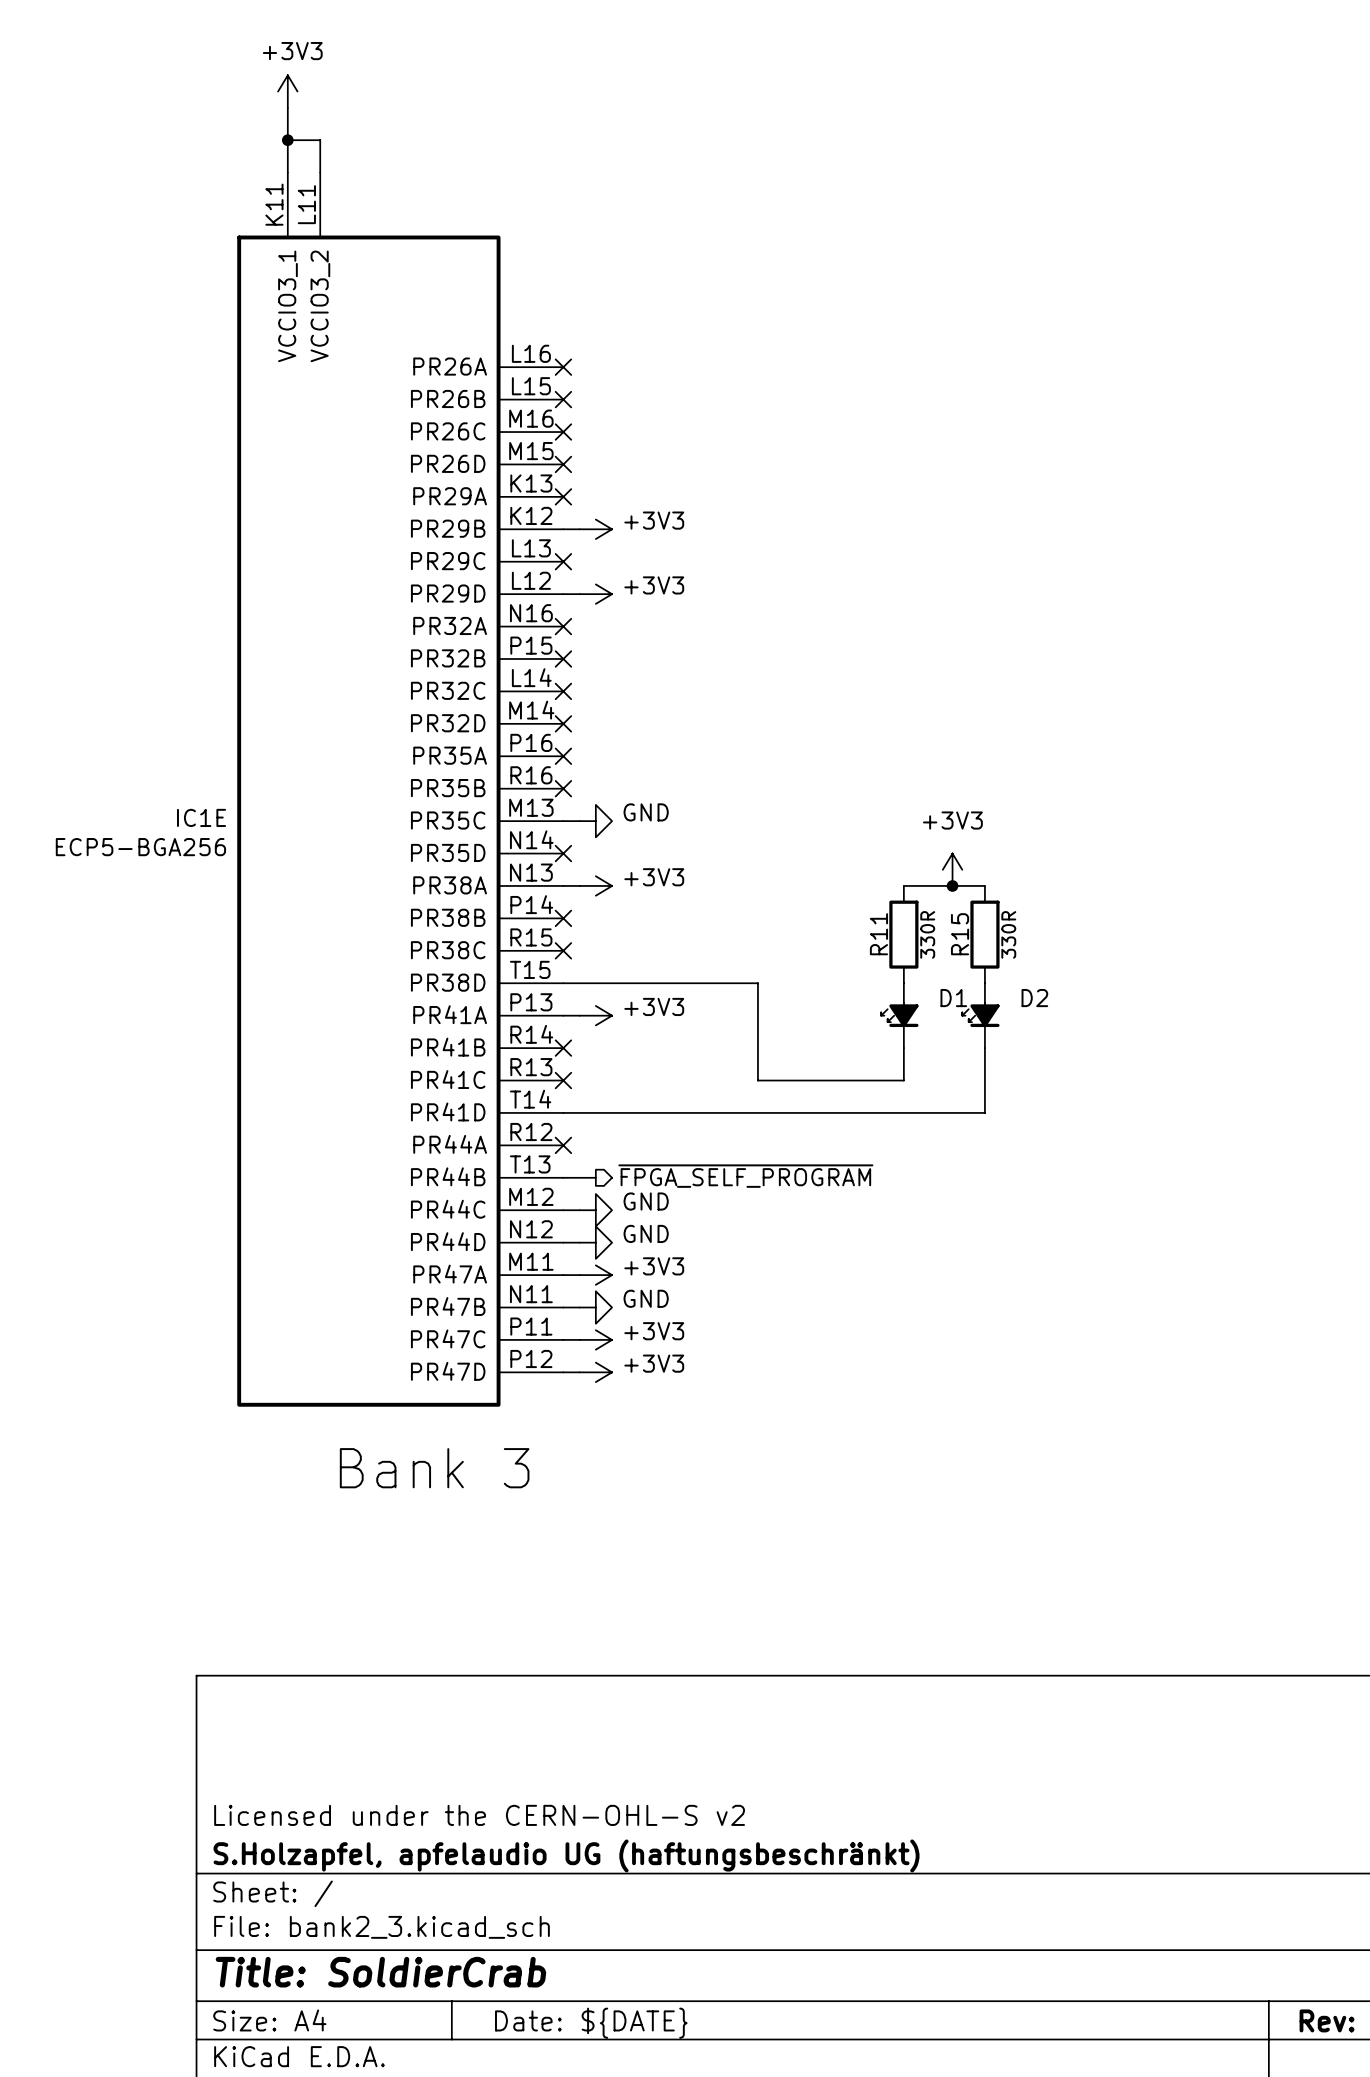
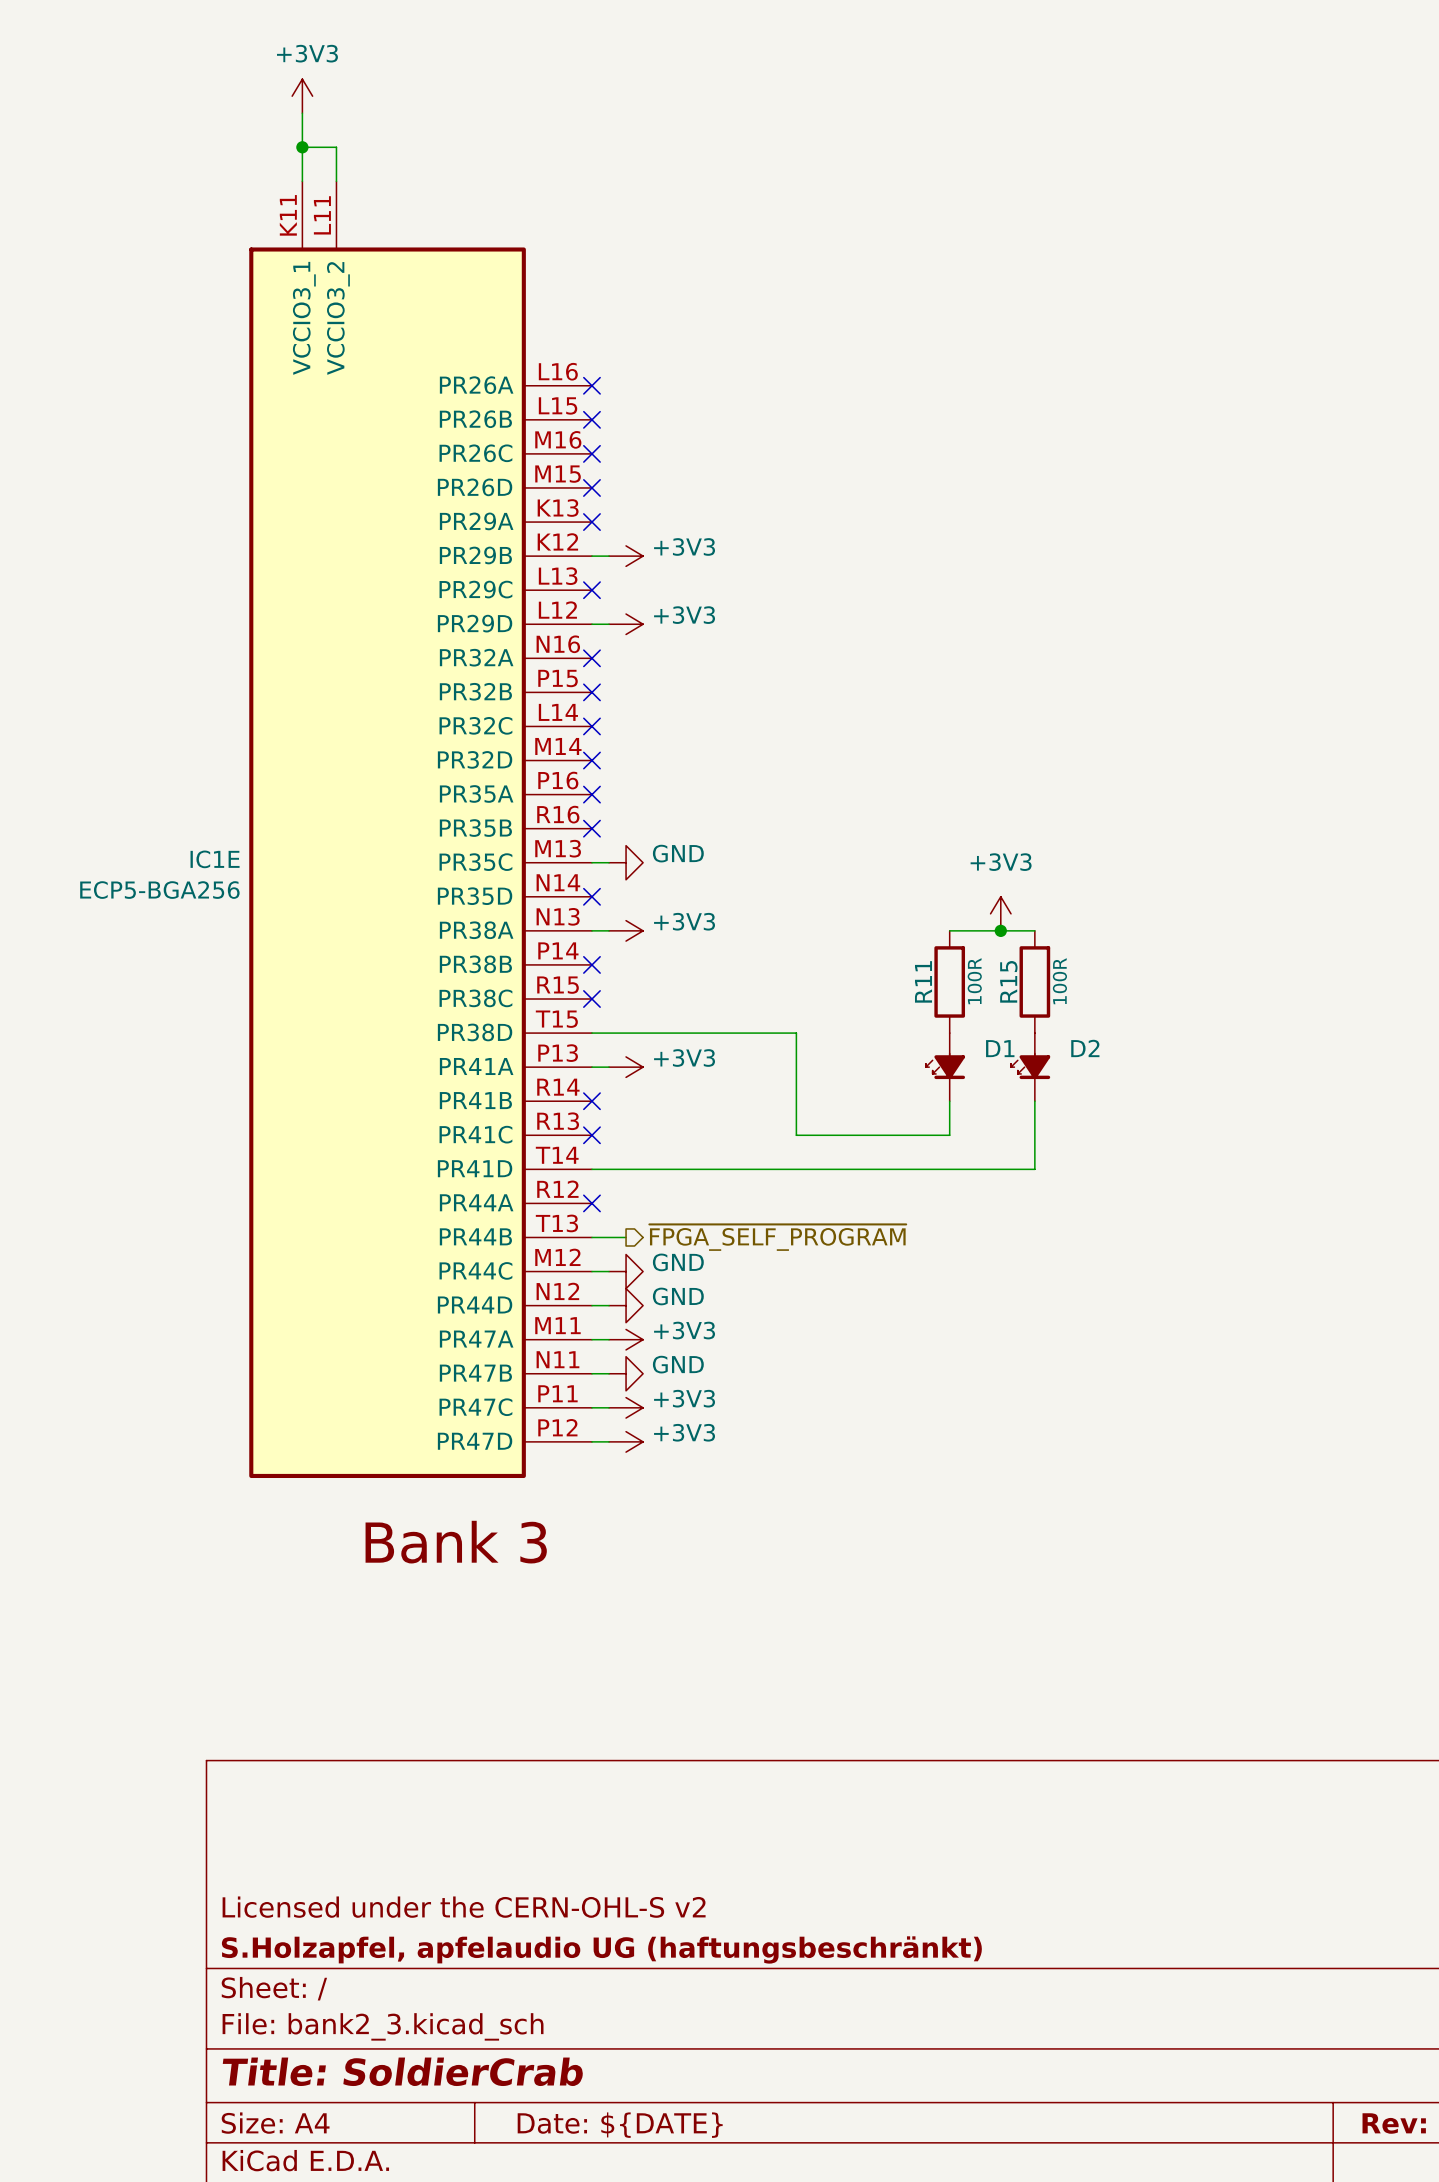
R11 value: 330R (927, 934) -> 100R (974, 981)
R15 value: 330R (1008, 934) -> 100R (1059, 981)

